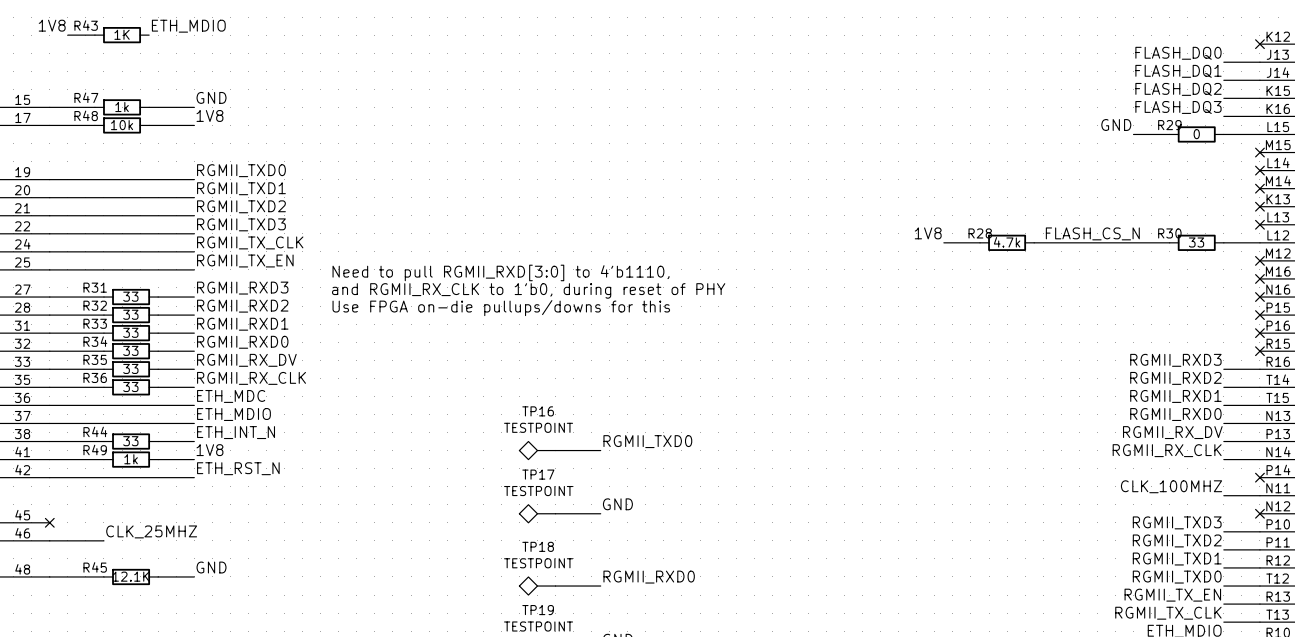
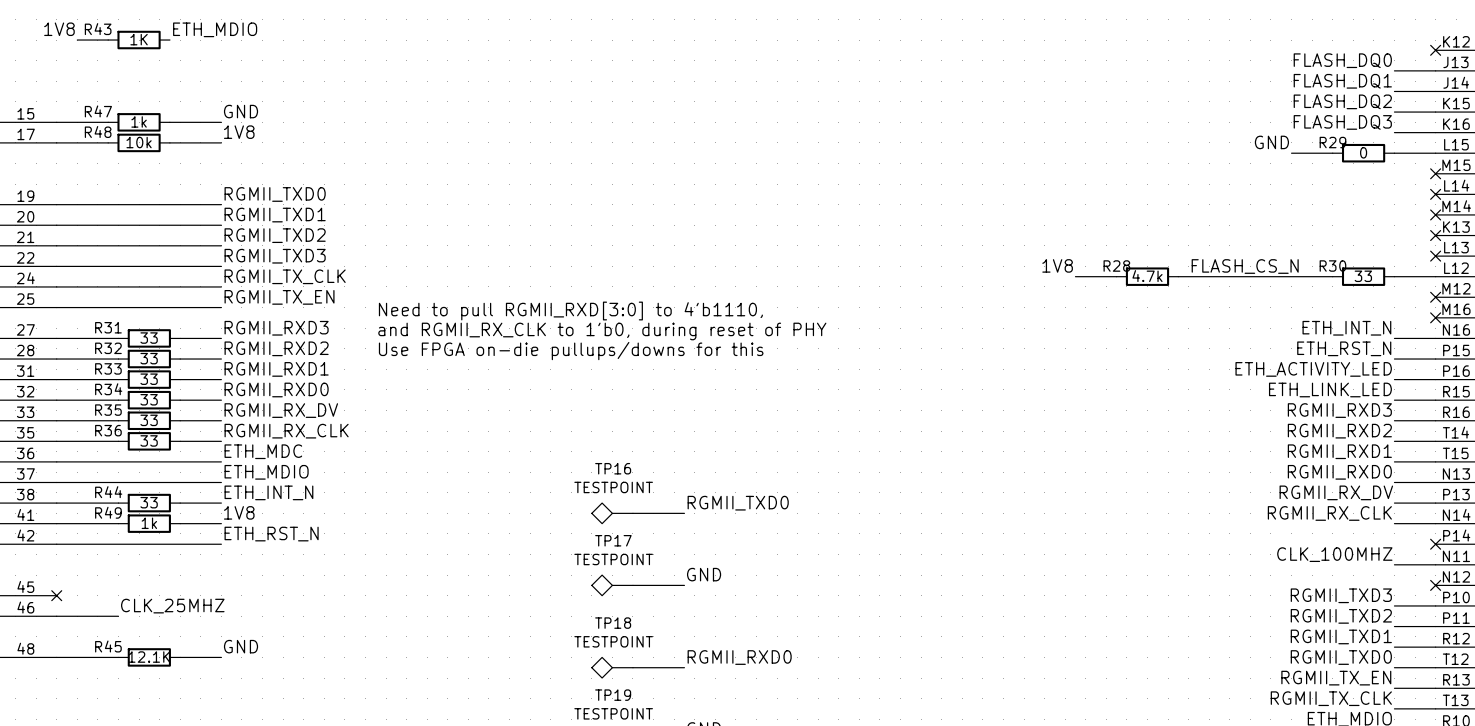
label: none -> ETH_INT_N (1346, 328)
wire: none -> (1394, 338) (1435, 338)
no-connect mark: (1259, 297) -> none
label: none -> ETH_RST_N (1344, 348)
wire: none -> (1394, 359) (1435, 359)
no-connect mark: (1259, 315) -> none
label: none -> ETH_ACTIVITY_LED (1313, 369)
wire: none -> (1394, 379) (1435, 379)
no-connect mark: (1259, 333) -> none
label: none -> ETH_LINK_LED (1330, 389)
wire: none -> (1394, 400) (1435, 400)
no-connect mark: (1259, 351) -> none

